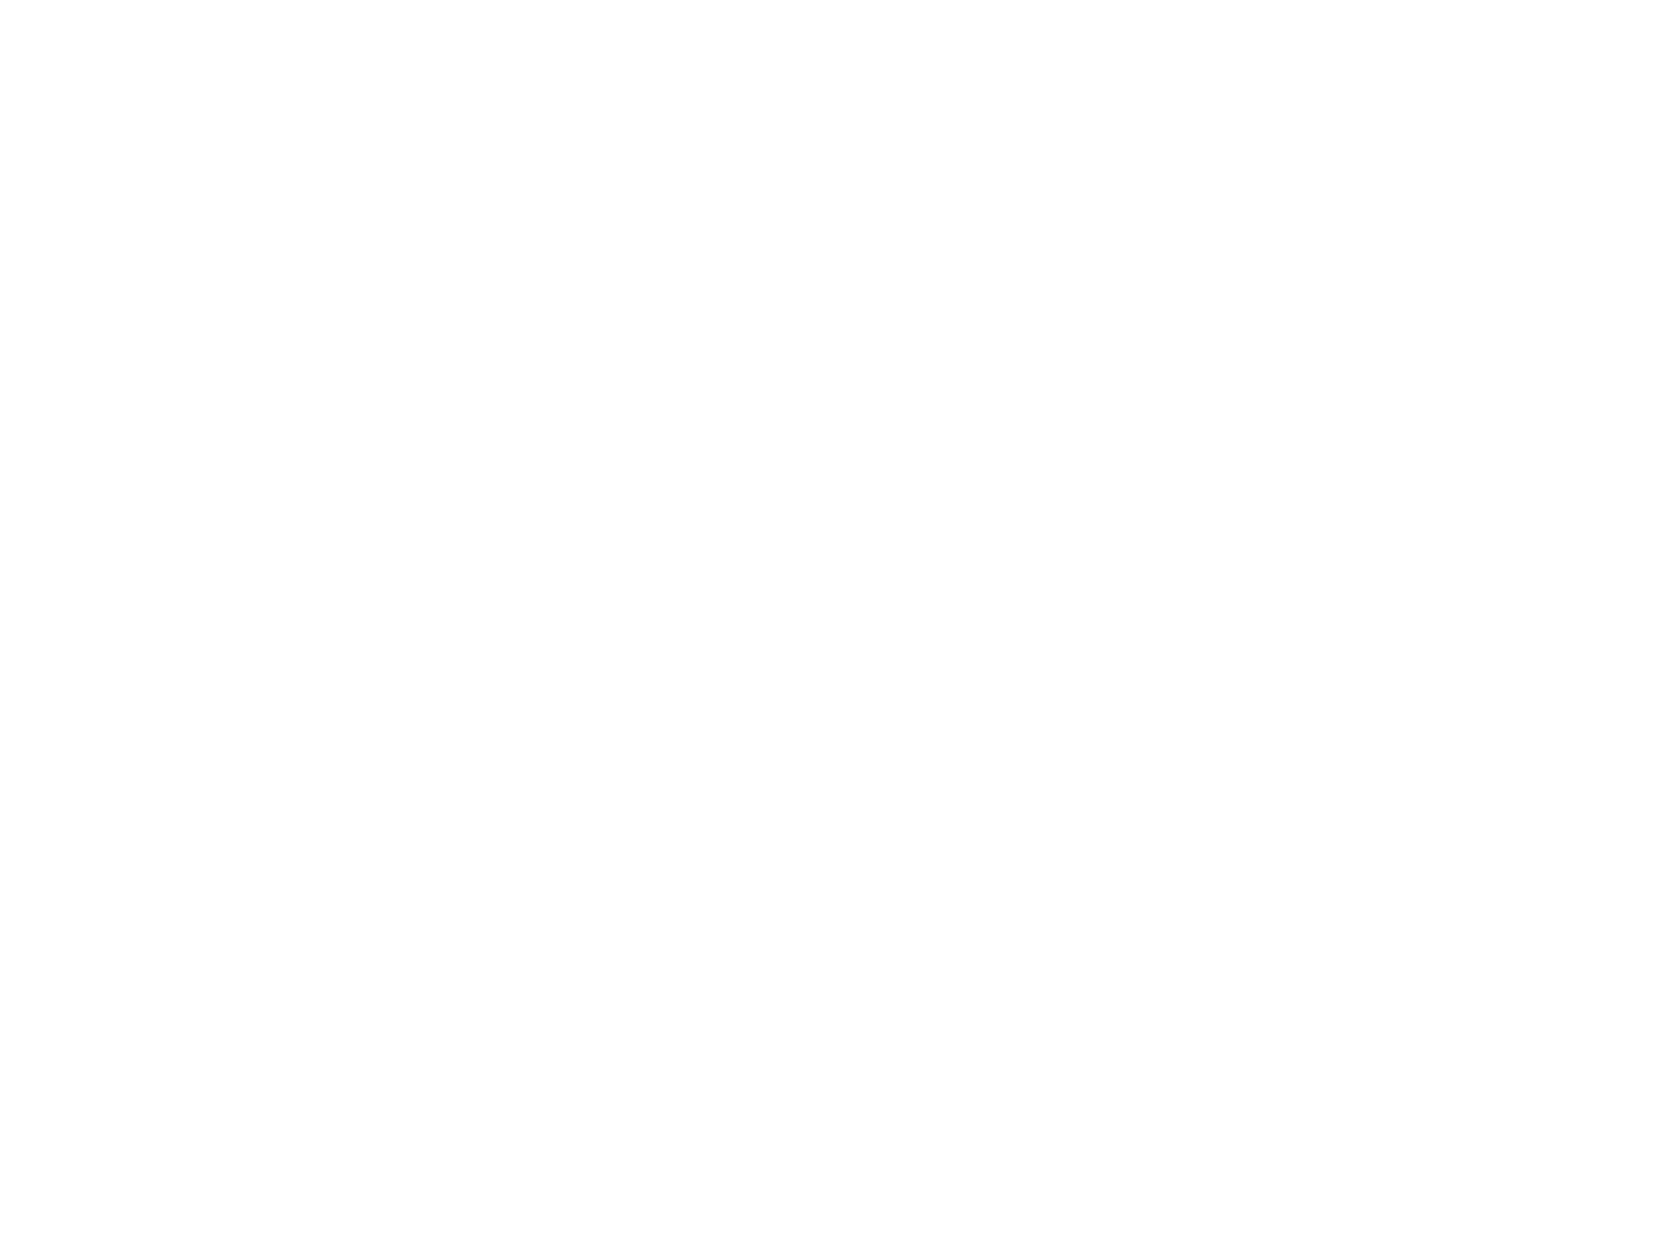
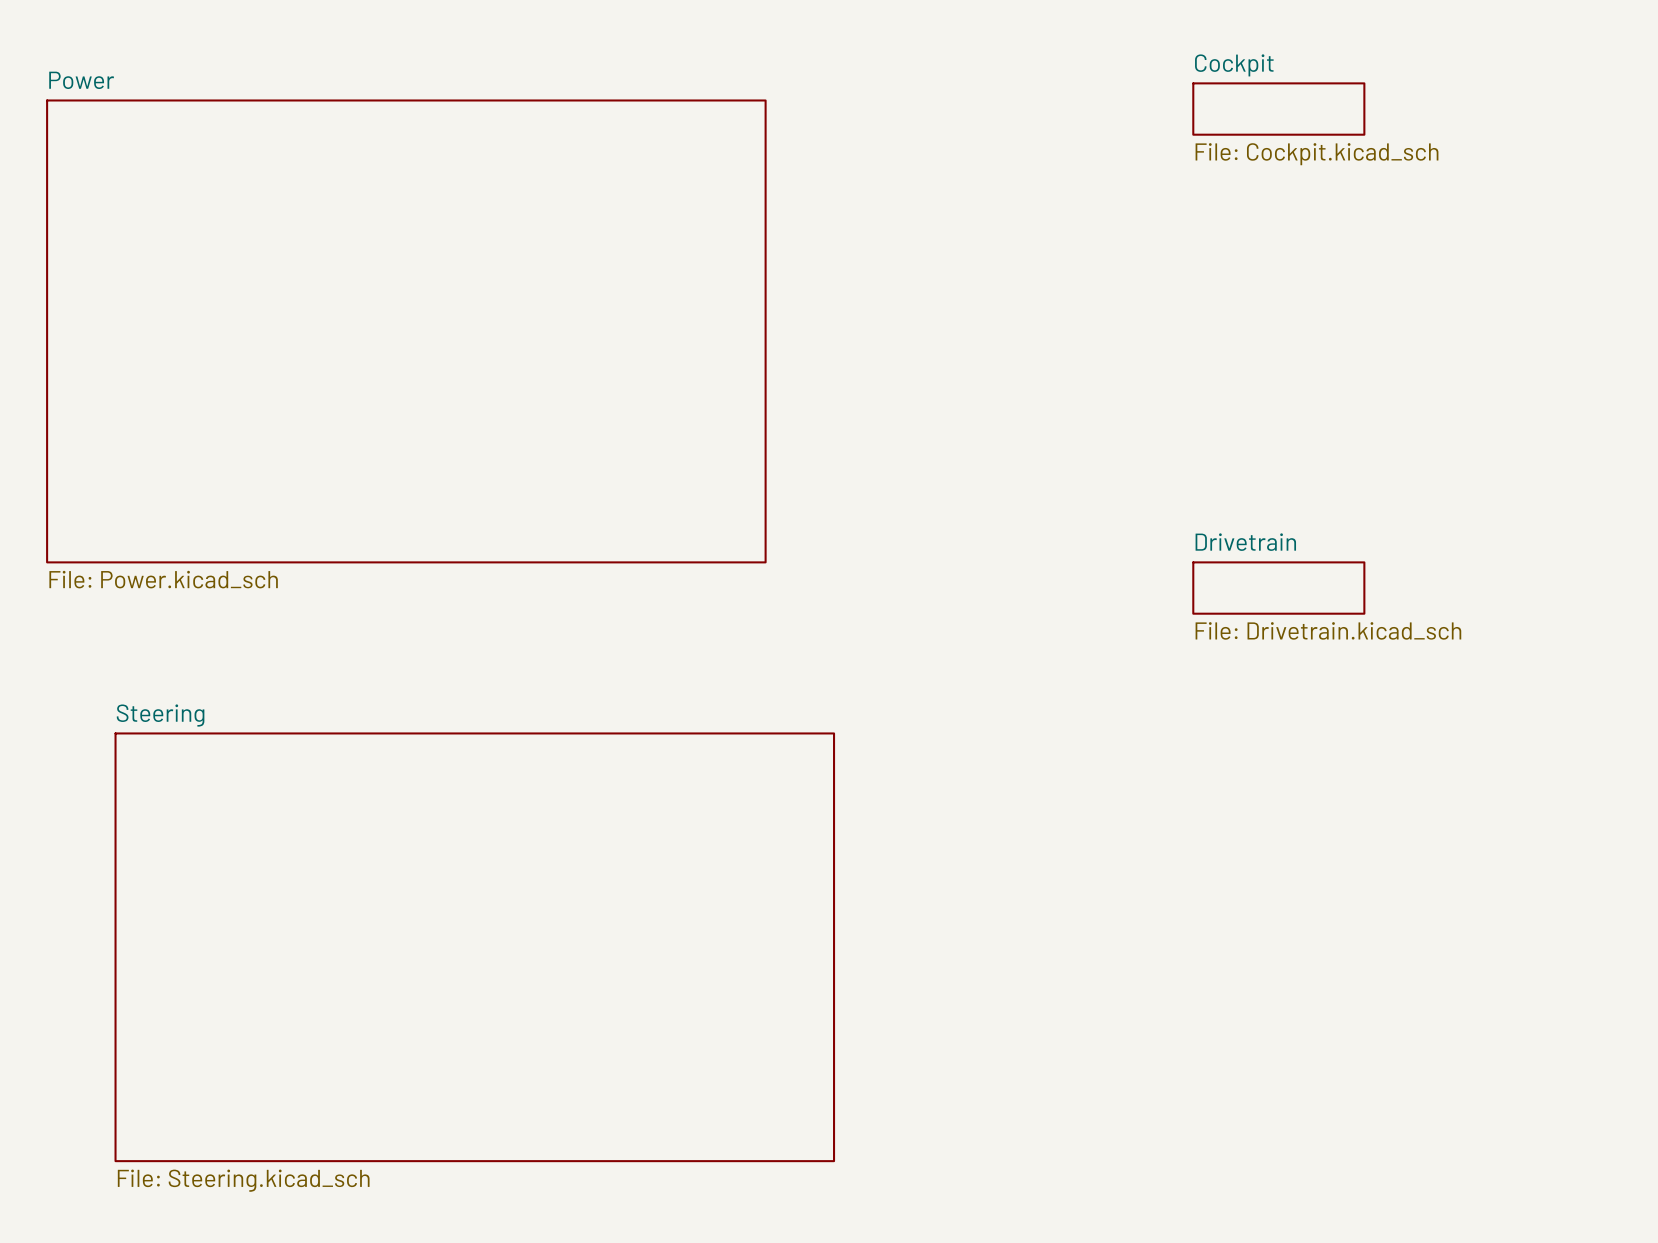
sheet Cockpit: none -> File: Cockpit.kicad_sch (1278, 109)
sheet Power: none -> File: Power.kicad_sch (406, 331)
sheet Drivetrain: none -> File: Drivetrain.kicad_sch (1278, 588)
sheet Steering: none -> File: Steering.kicad_sch (474, 947)

